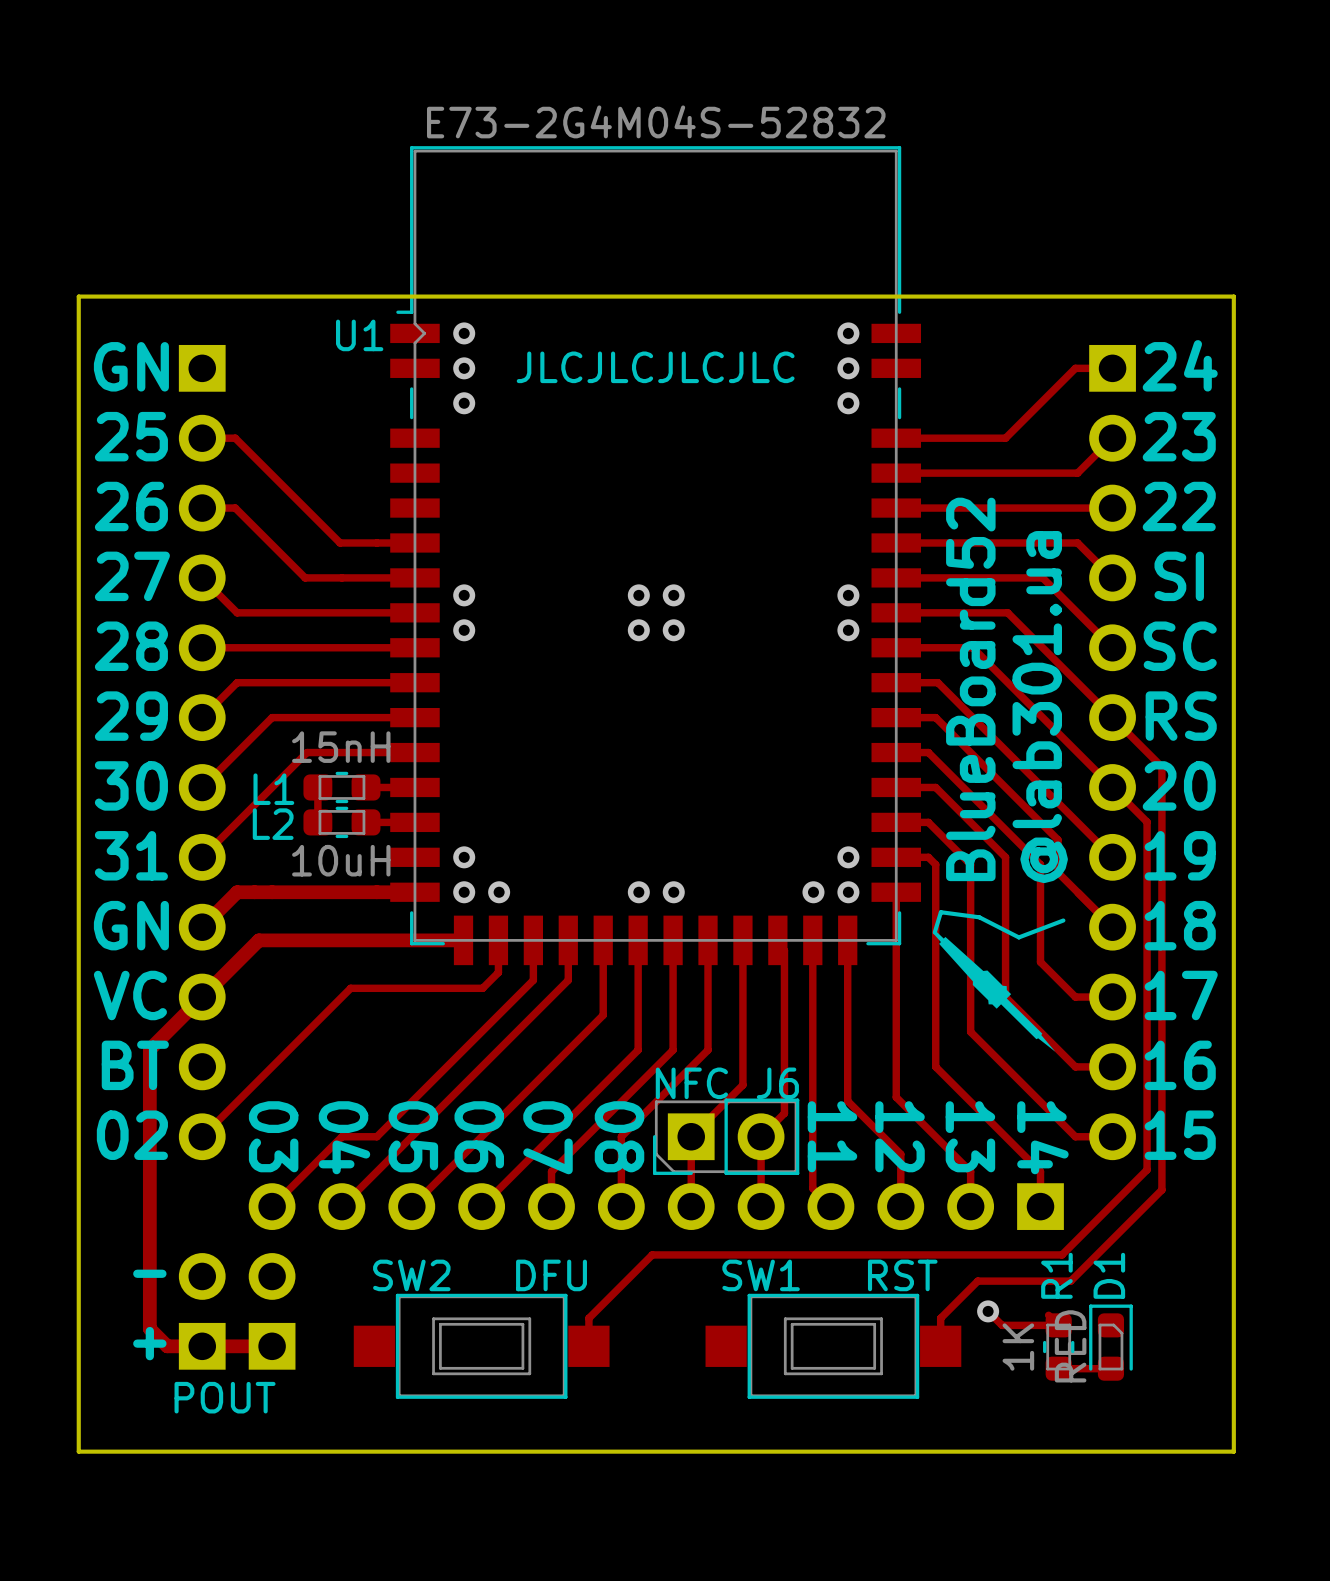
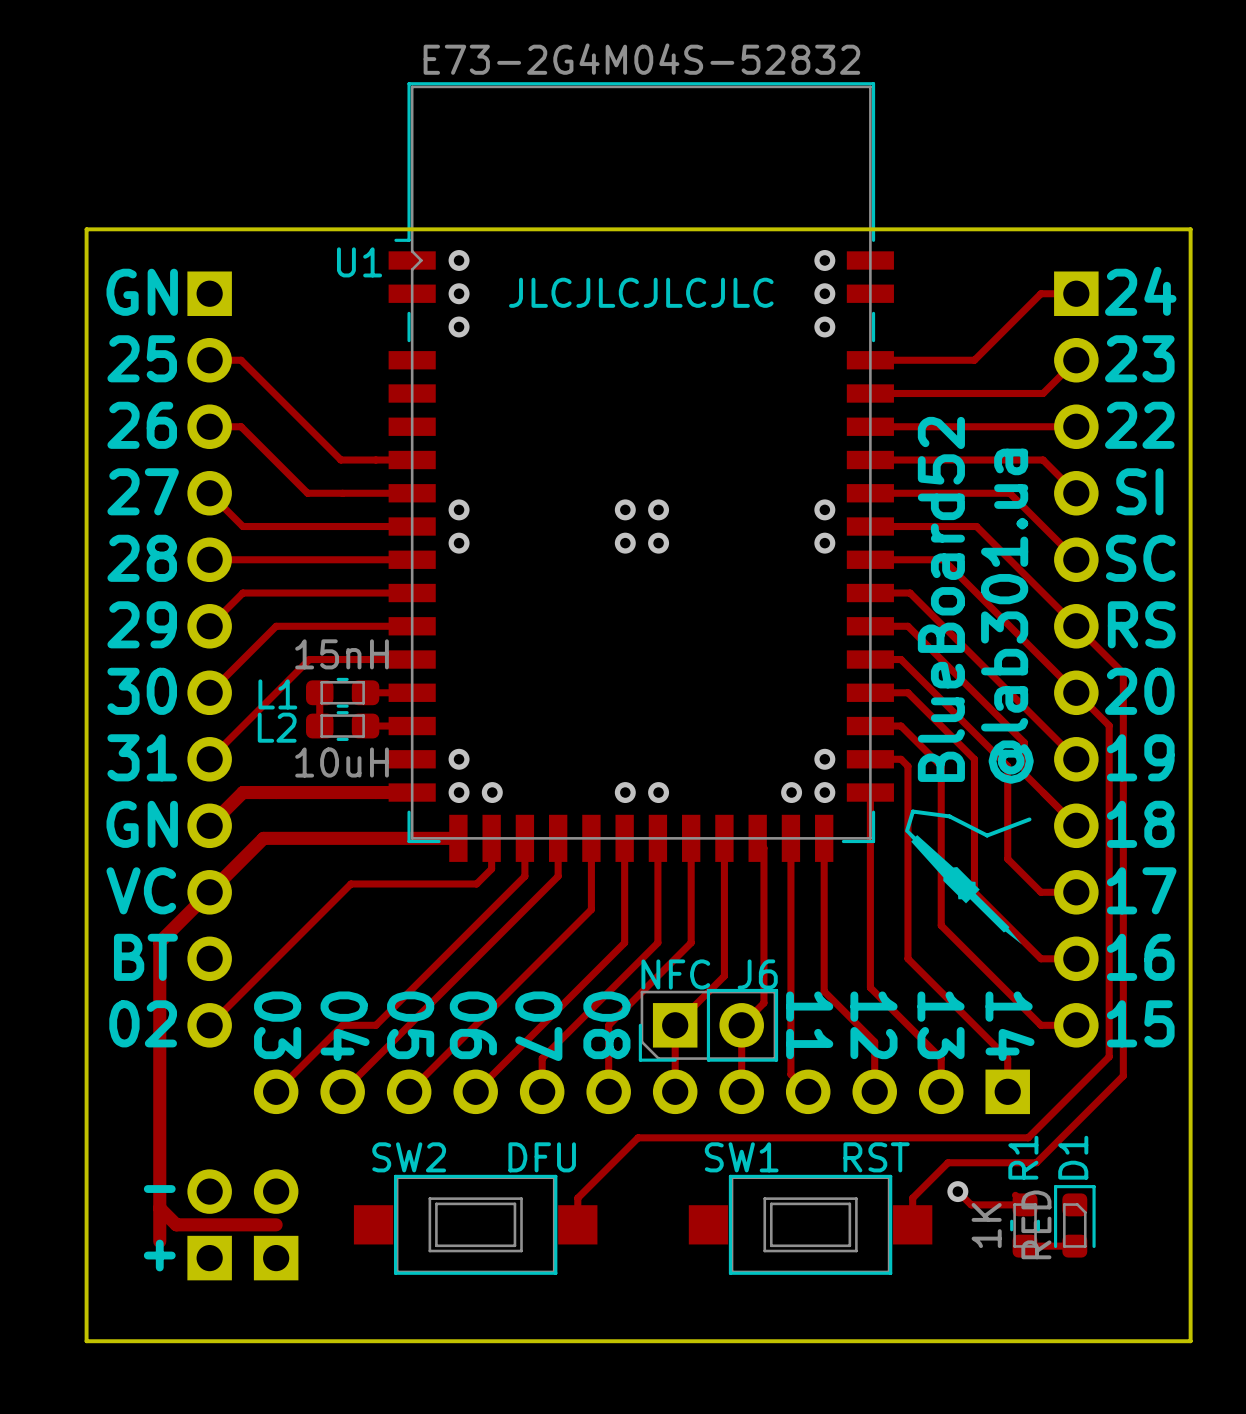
board edge: (78, 296) (78, 1451) (1233, 1451) (1233, 296) (78, 296) -> (86, 229) (86, 1341) (1190, 1341) (1190, 229) (86, 229)
text position: - (149, 1273) -> - (159, 1189)
part position: (202, 1311) -> (209, 1224)
part position: (272, 1311) -> (276, 1224)
text position: + (149, 1343) -> + (159, 1255)
text: POUT (225, 1397) -> none

